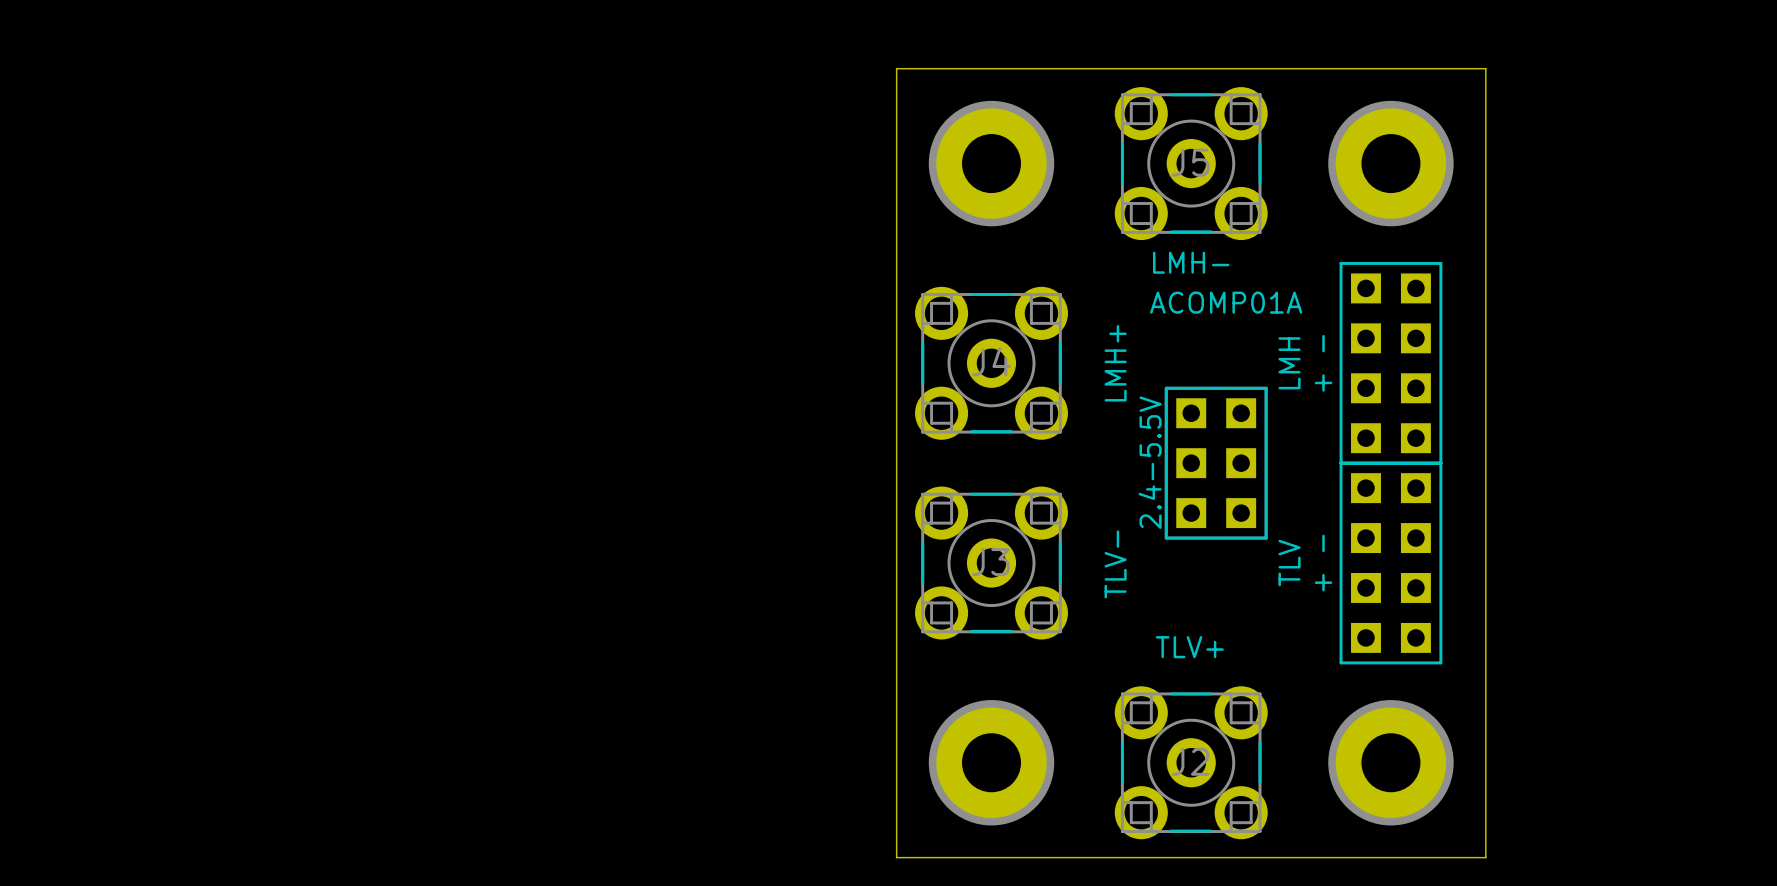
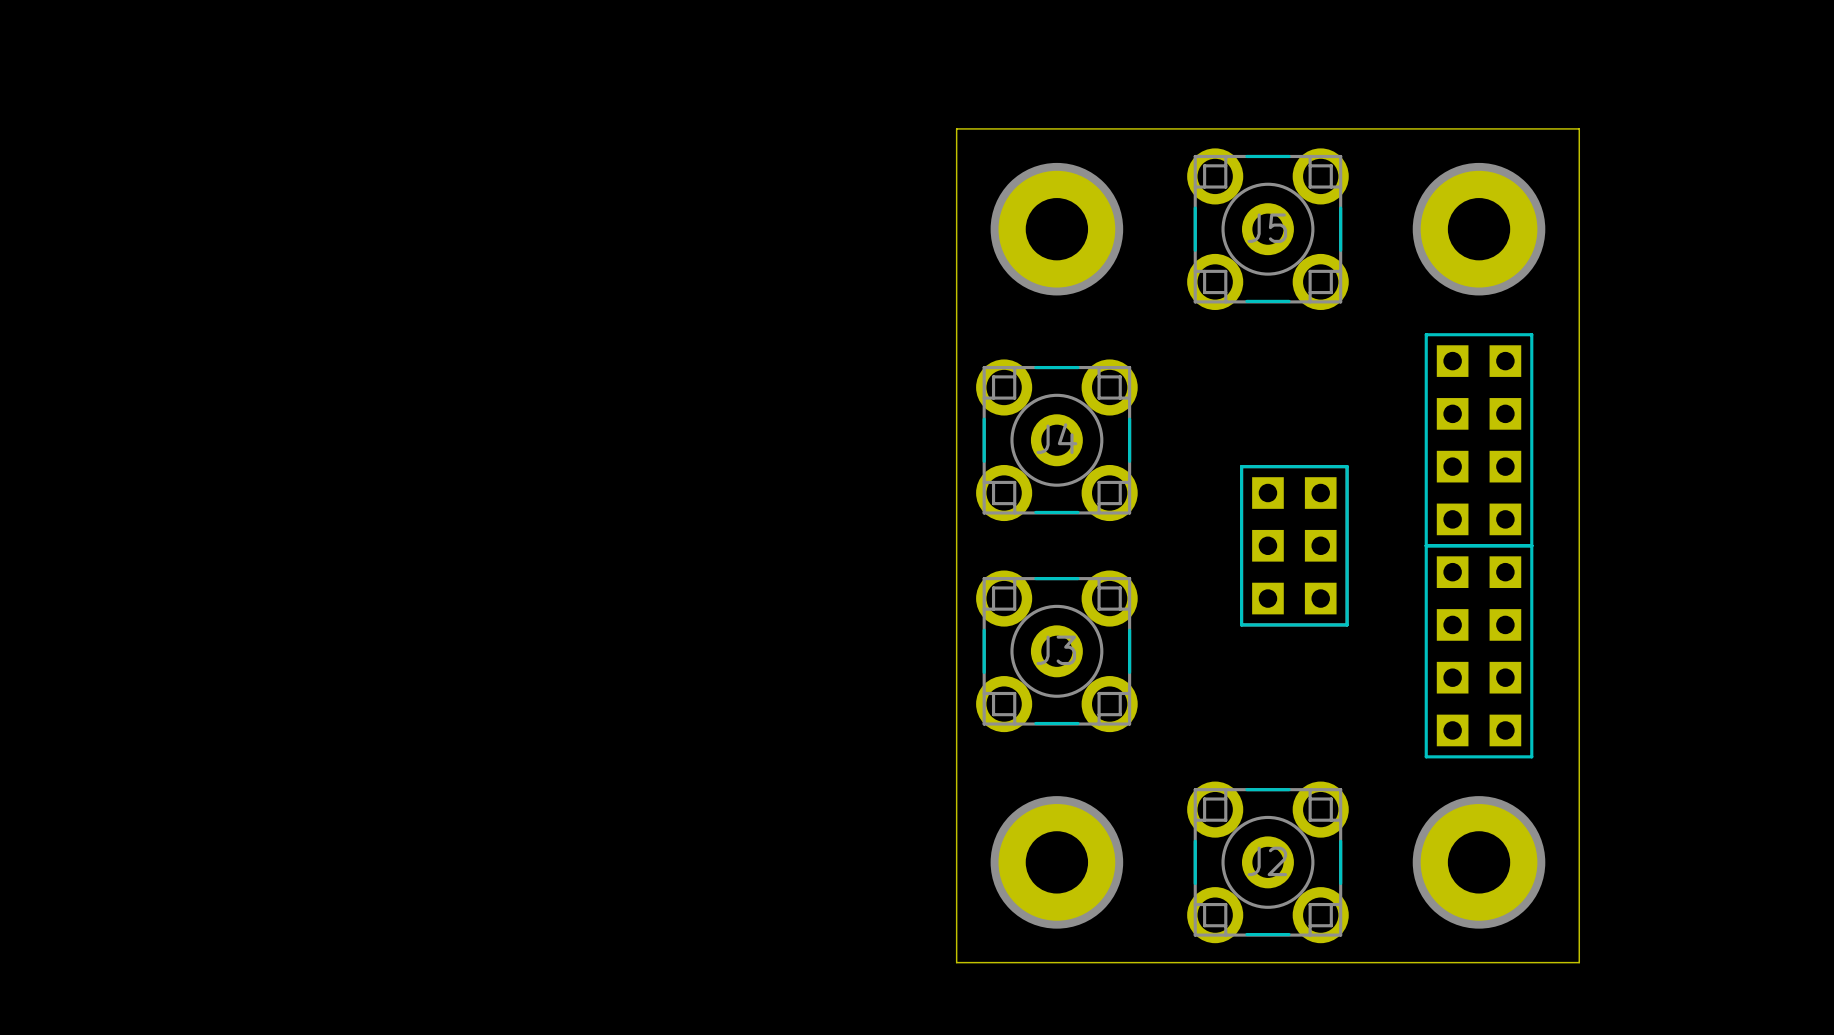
text: LMH- (1191, 262) -> none
text: ACOMP01A (1226, 302) -> none
text: LMH+ (1115, 363) -> none
text: LMH (1289, 363) -> none
text: + - (1323, 363) -> none
text: 2.4-5.5V (1150, 462) -> none
text: TLV (1289, 563) -> none
text: + - (1323, 563) -> none
text: TLV- (1115, 564) -> none
text: TLV+ (1189, 647) -> none

